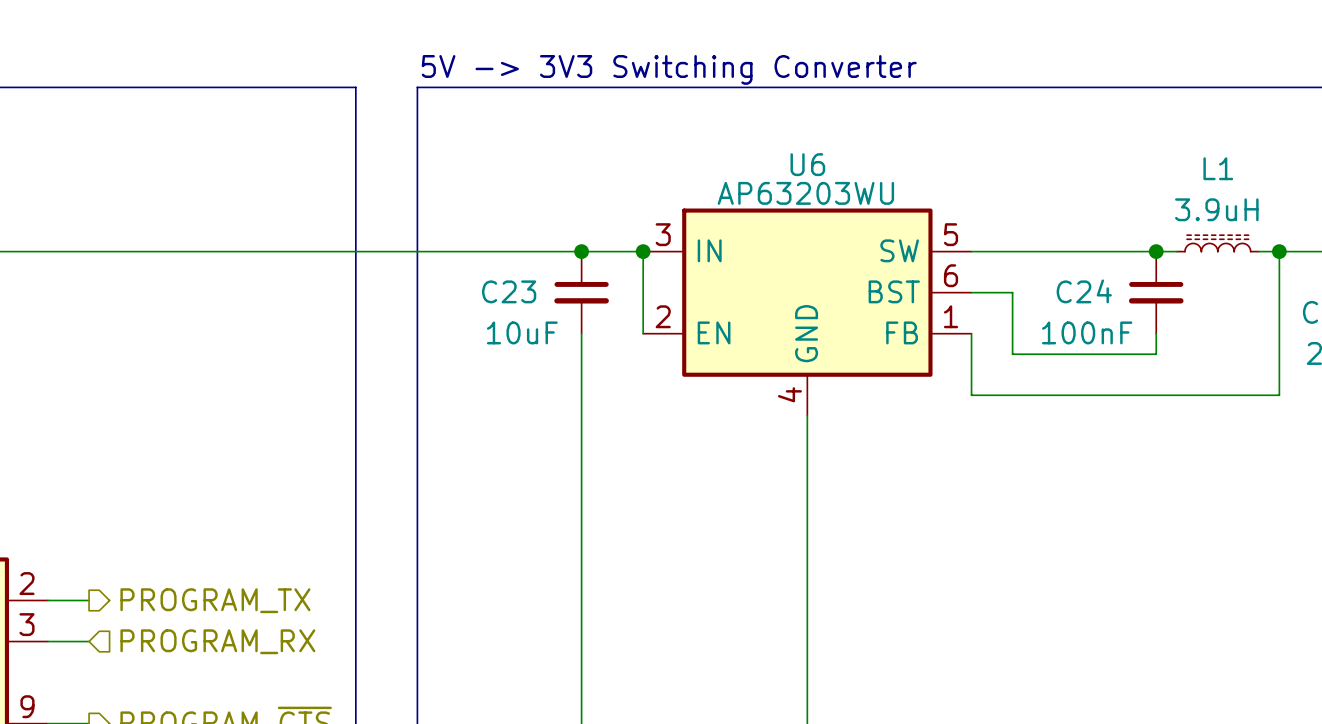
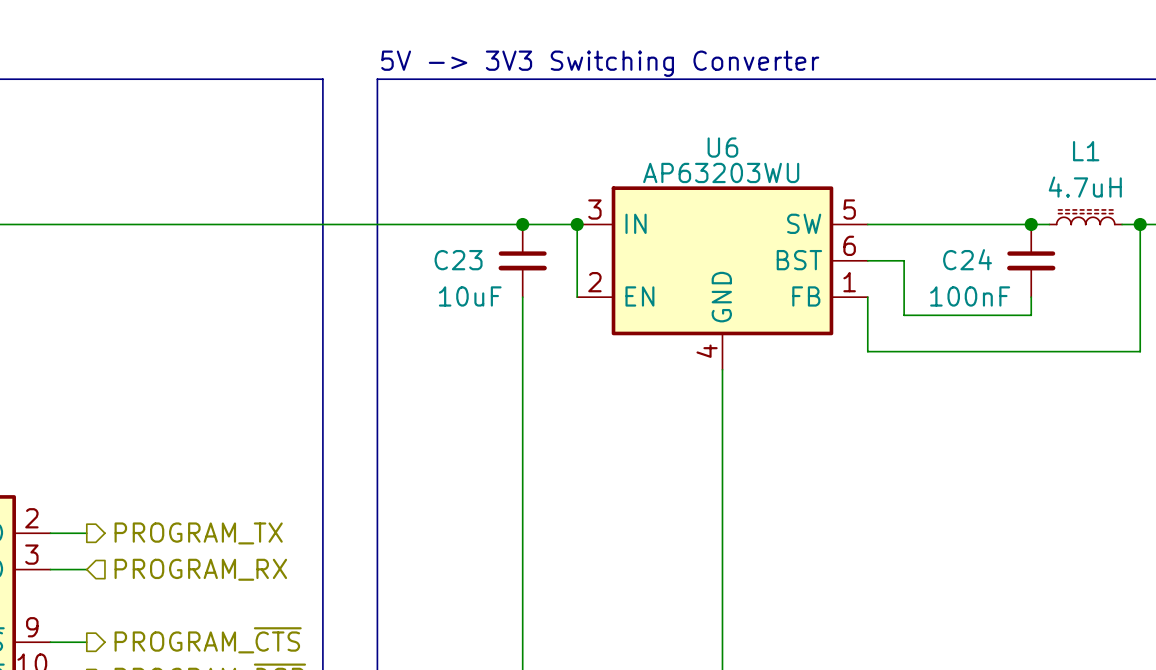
L1 value: 3.9uH (1216, 209) -> 4.7uH (1085, 187)

